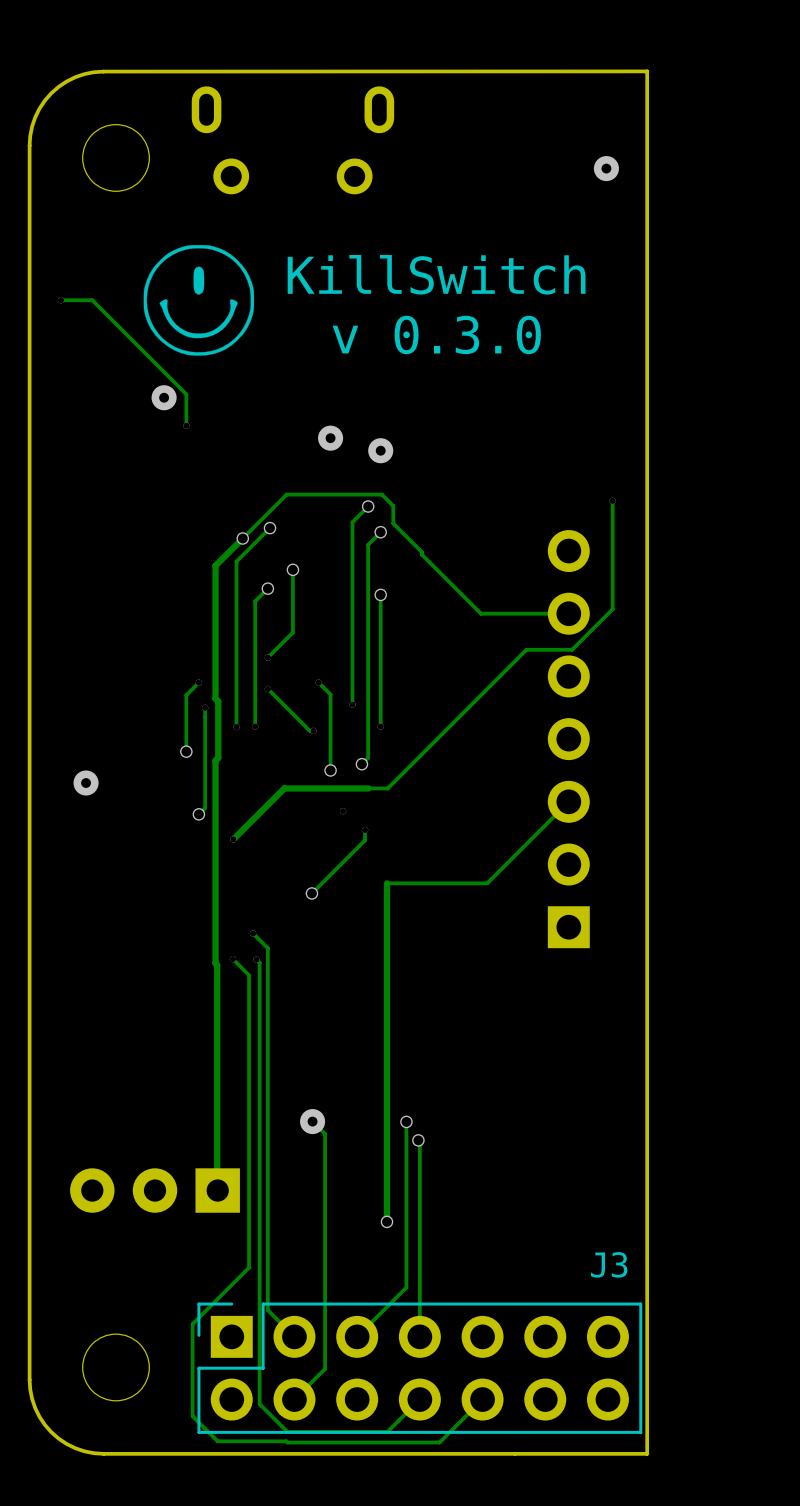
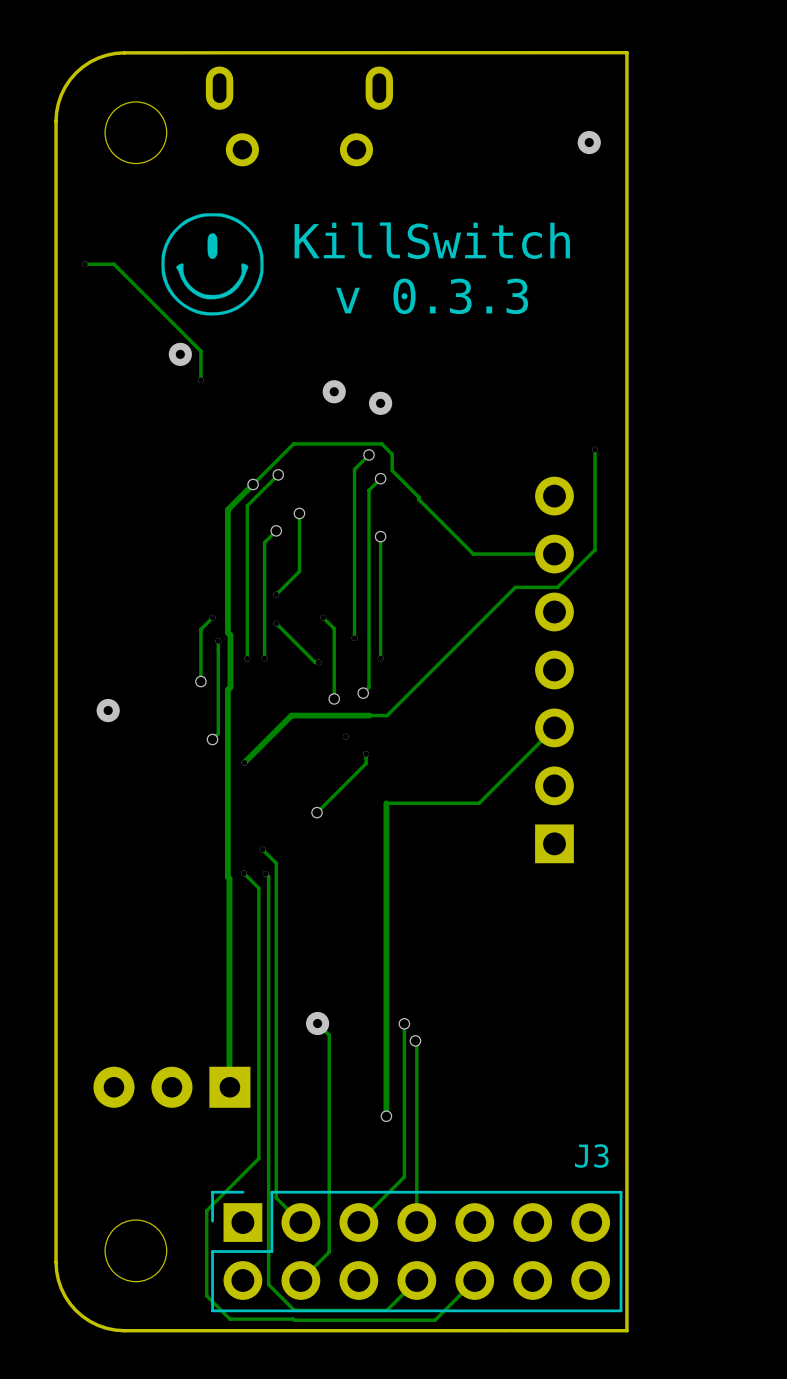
text: v 0.3.0 (436, 334) -> v 0.3.3 (432, 296)

